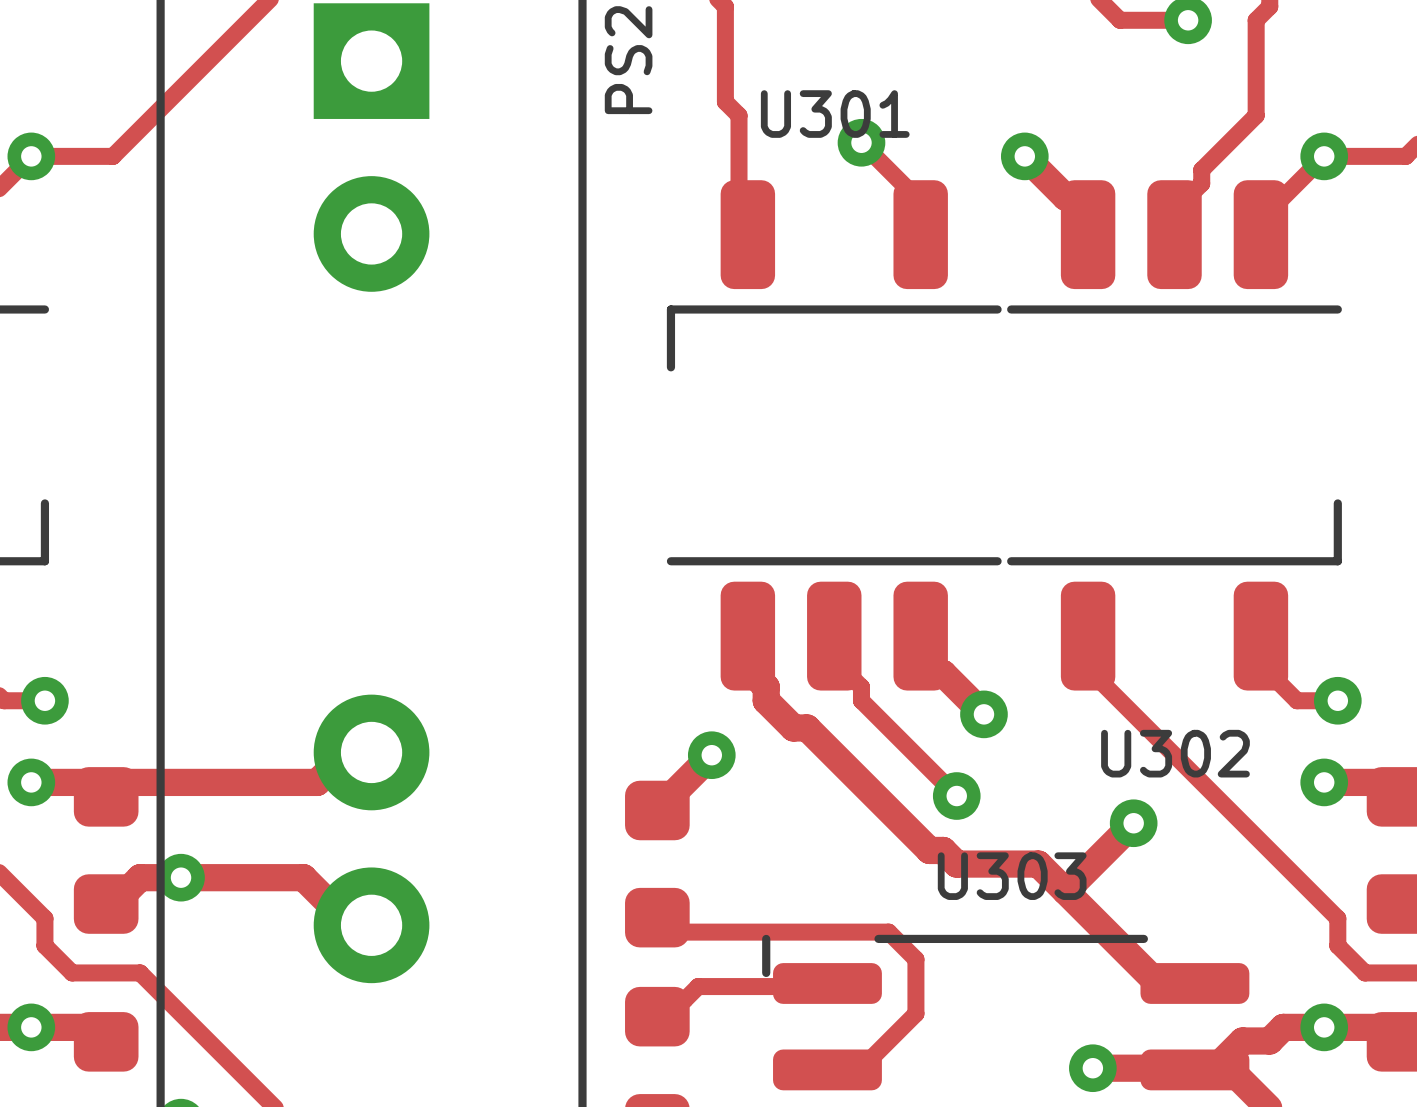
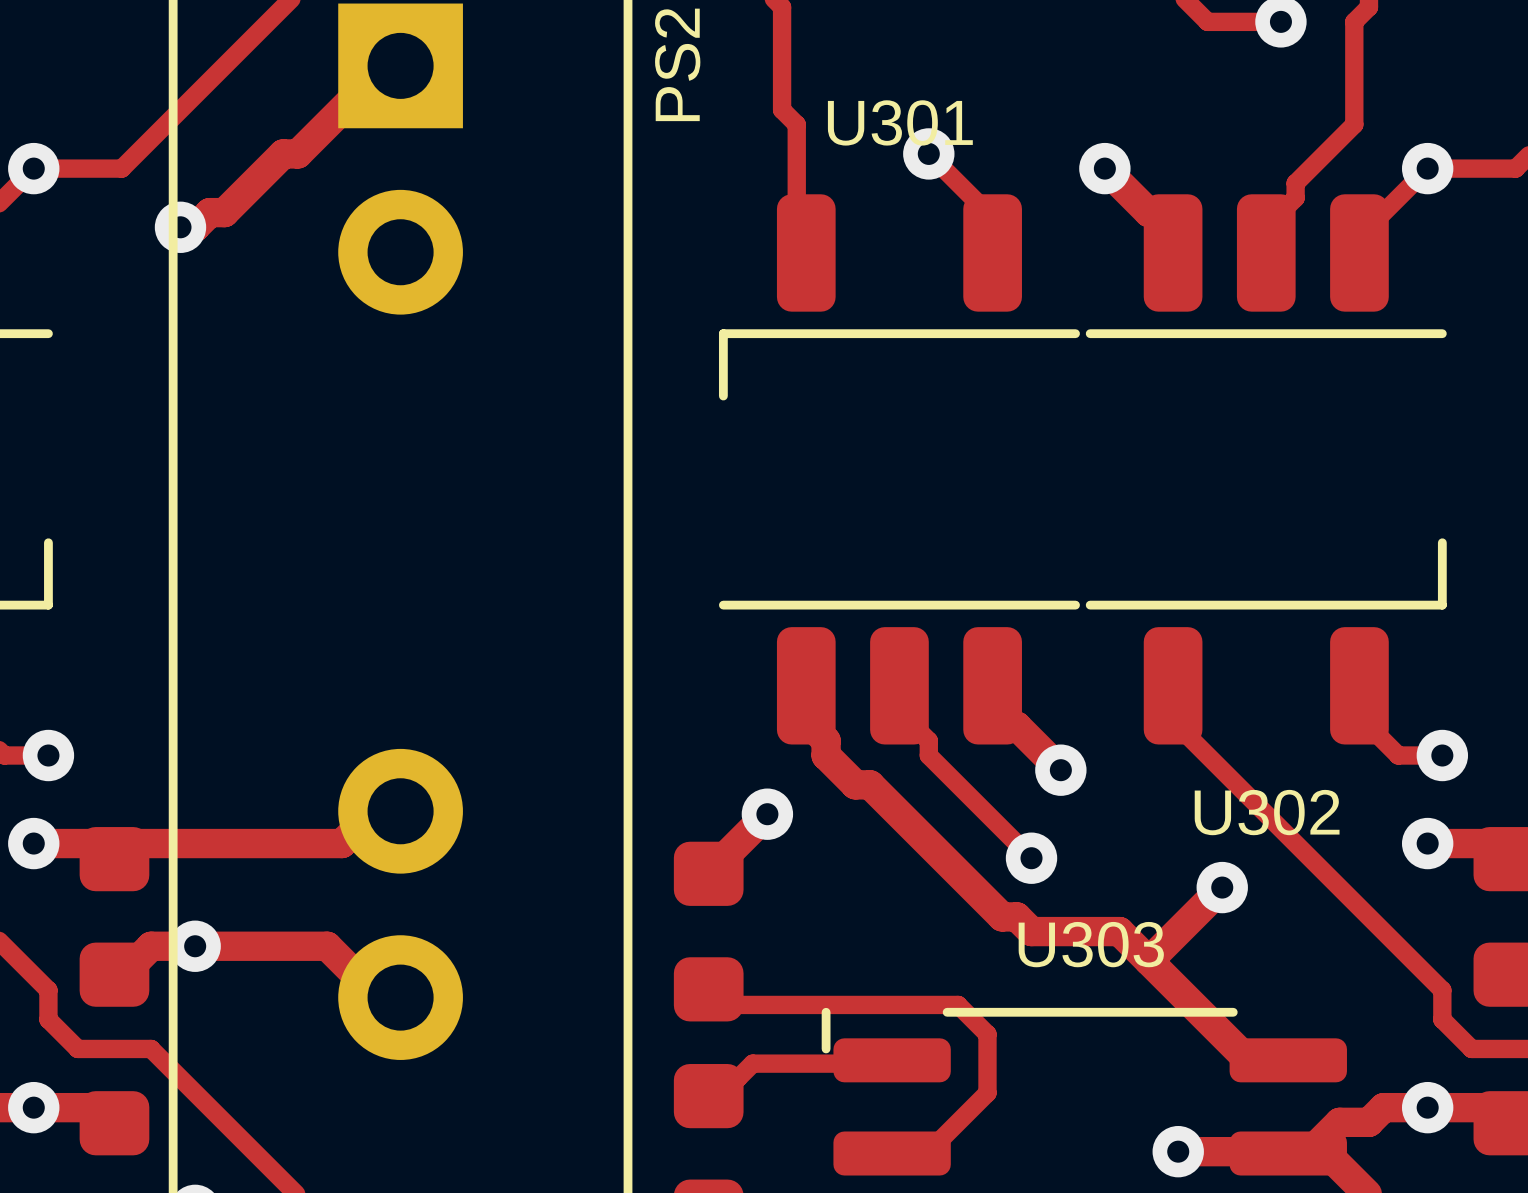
track: none -> (400, 65) (356, 95) (297, 153) (283, 153) (224, 212) (209, 212) (195, 227) (180, 227)
via: none -> (180, 227)

